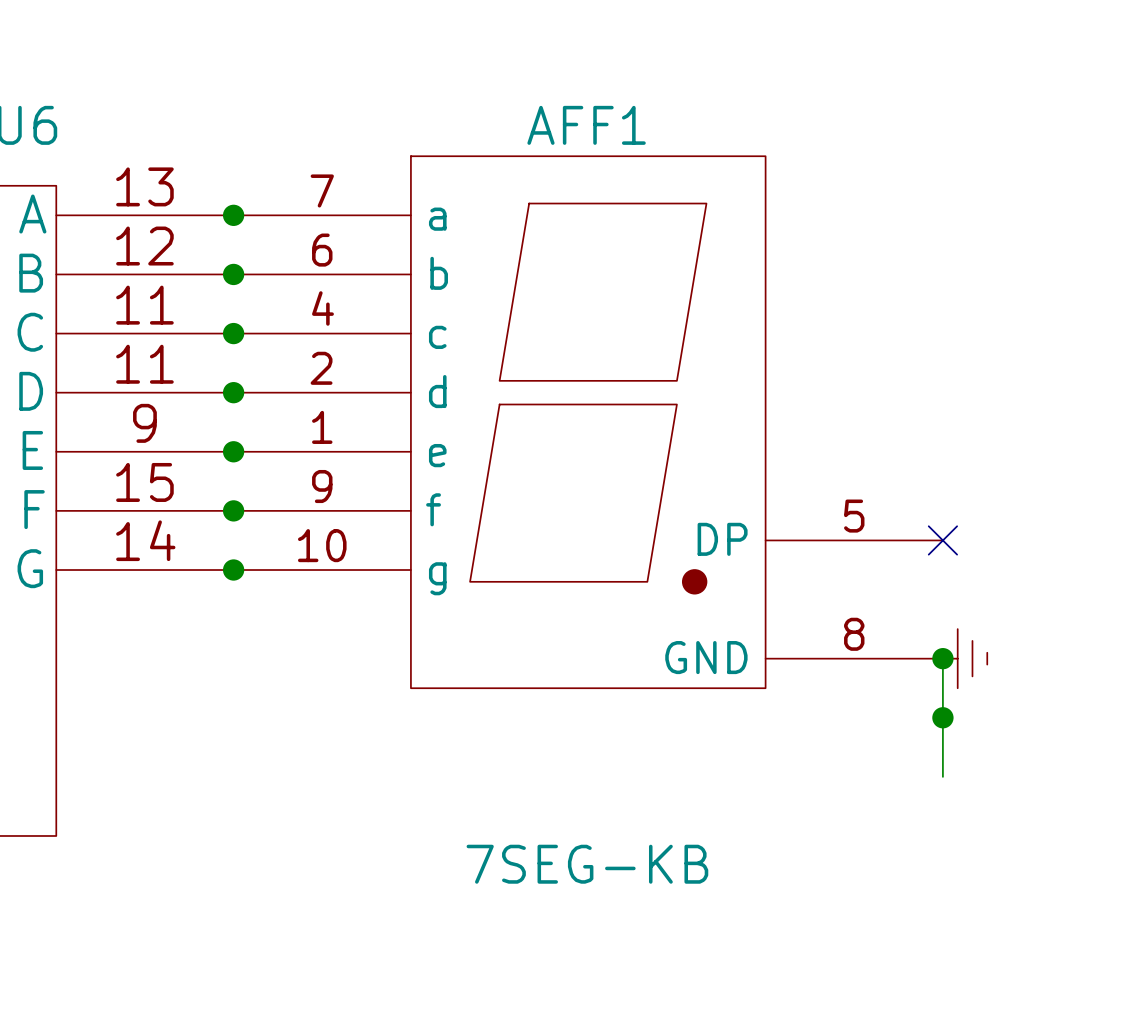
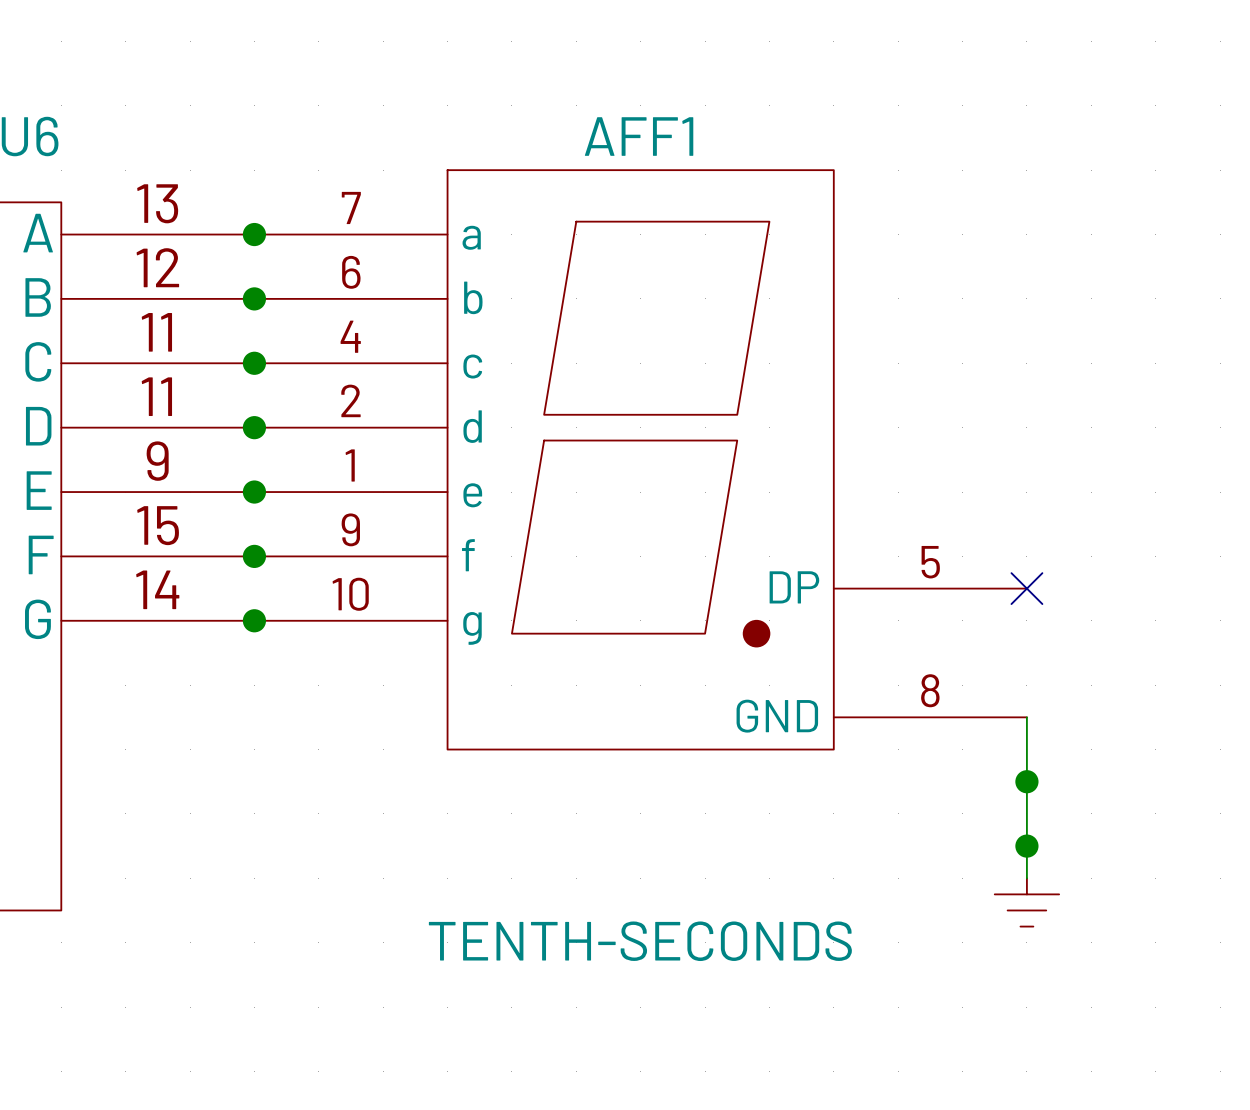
junction position: (942, 658) -> (1026, 846)
power symbol rotation: 0° (965, 658) -> 90° clockwise (1026, 902)
power symbol position: (965, 658) -> (1026, 902)
wire: none -> (1026, 846) (1026, 878)
AFF1 value: 7SEG-KB (587, 864) -> TENTH-SECONDS (640, 941)

